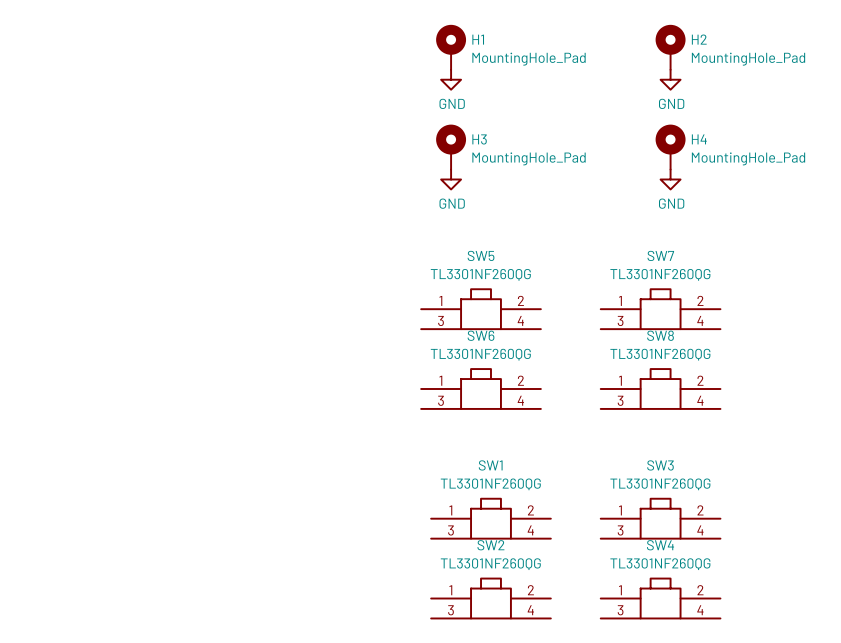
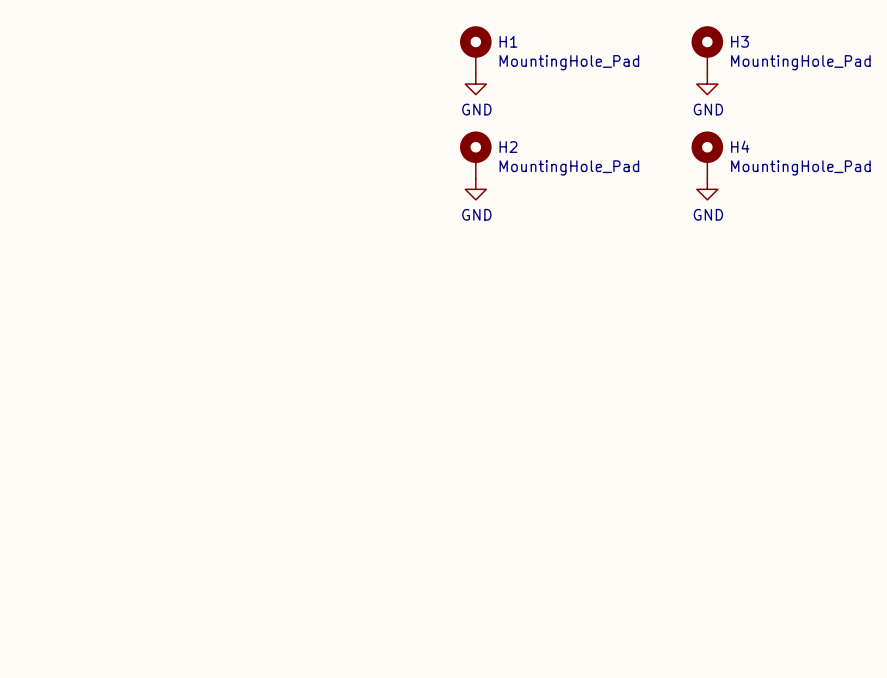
H2 name: H2 (699, 39) -> H3 (739, 41)
H3 name: H3 (479, 139) -> H2 (508, 147)
SW5: TL3301NF260QG (481, 309) -> none
SW7: TL3301NF260QG (660, 309) -> none
SW6: TL3301NF260QG (481, 388) -> none
SW8: TL3301NF260QG (660, 388) -> none
SW1: TL3301NF260QG (490, 518) -> none
SW3: TL3301NF260QG (660, 518) -> none
SW2: TL3301NF260QG (490, 598) -> none
SW4: TL3301NF260QG (660, 598) -> none

